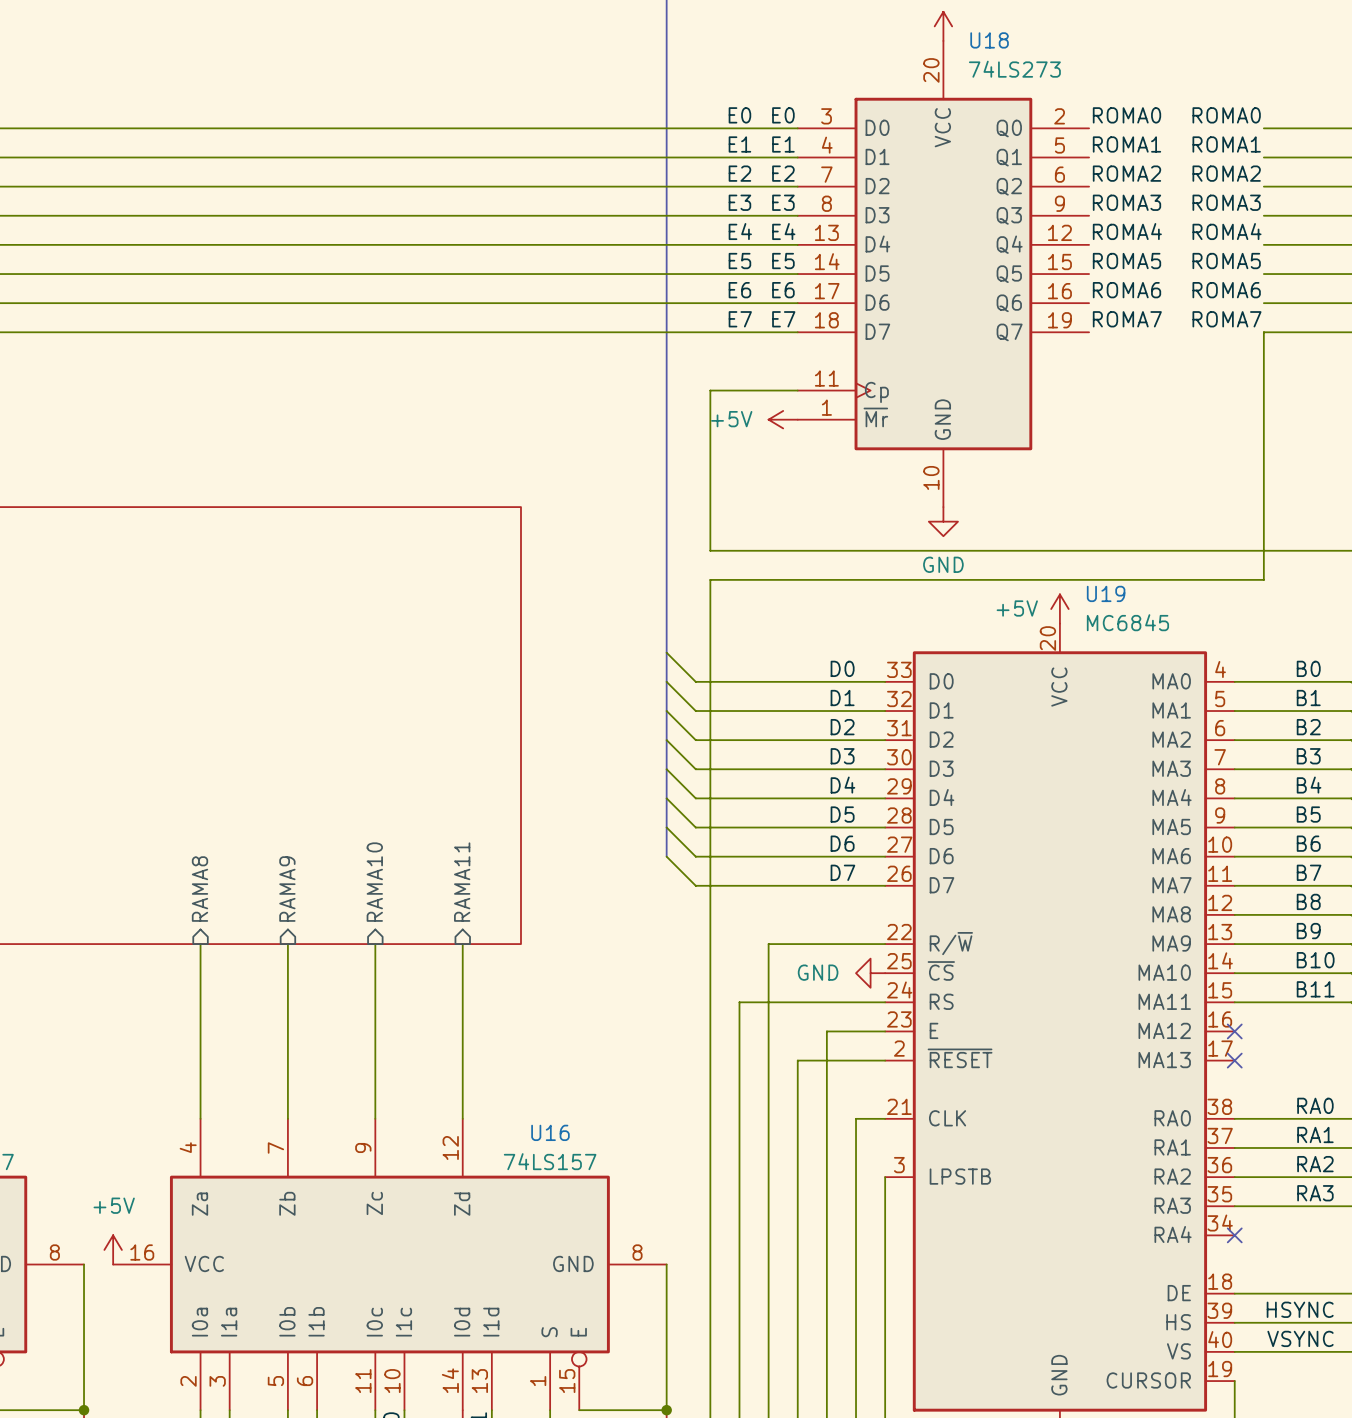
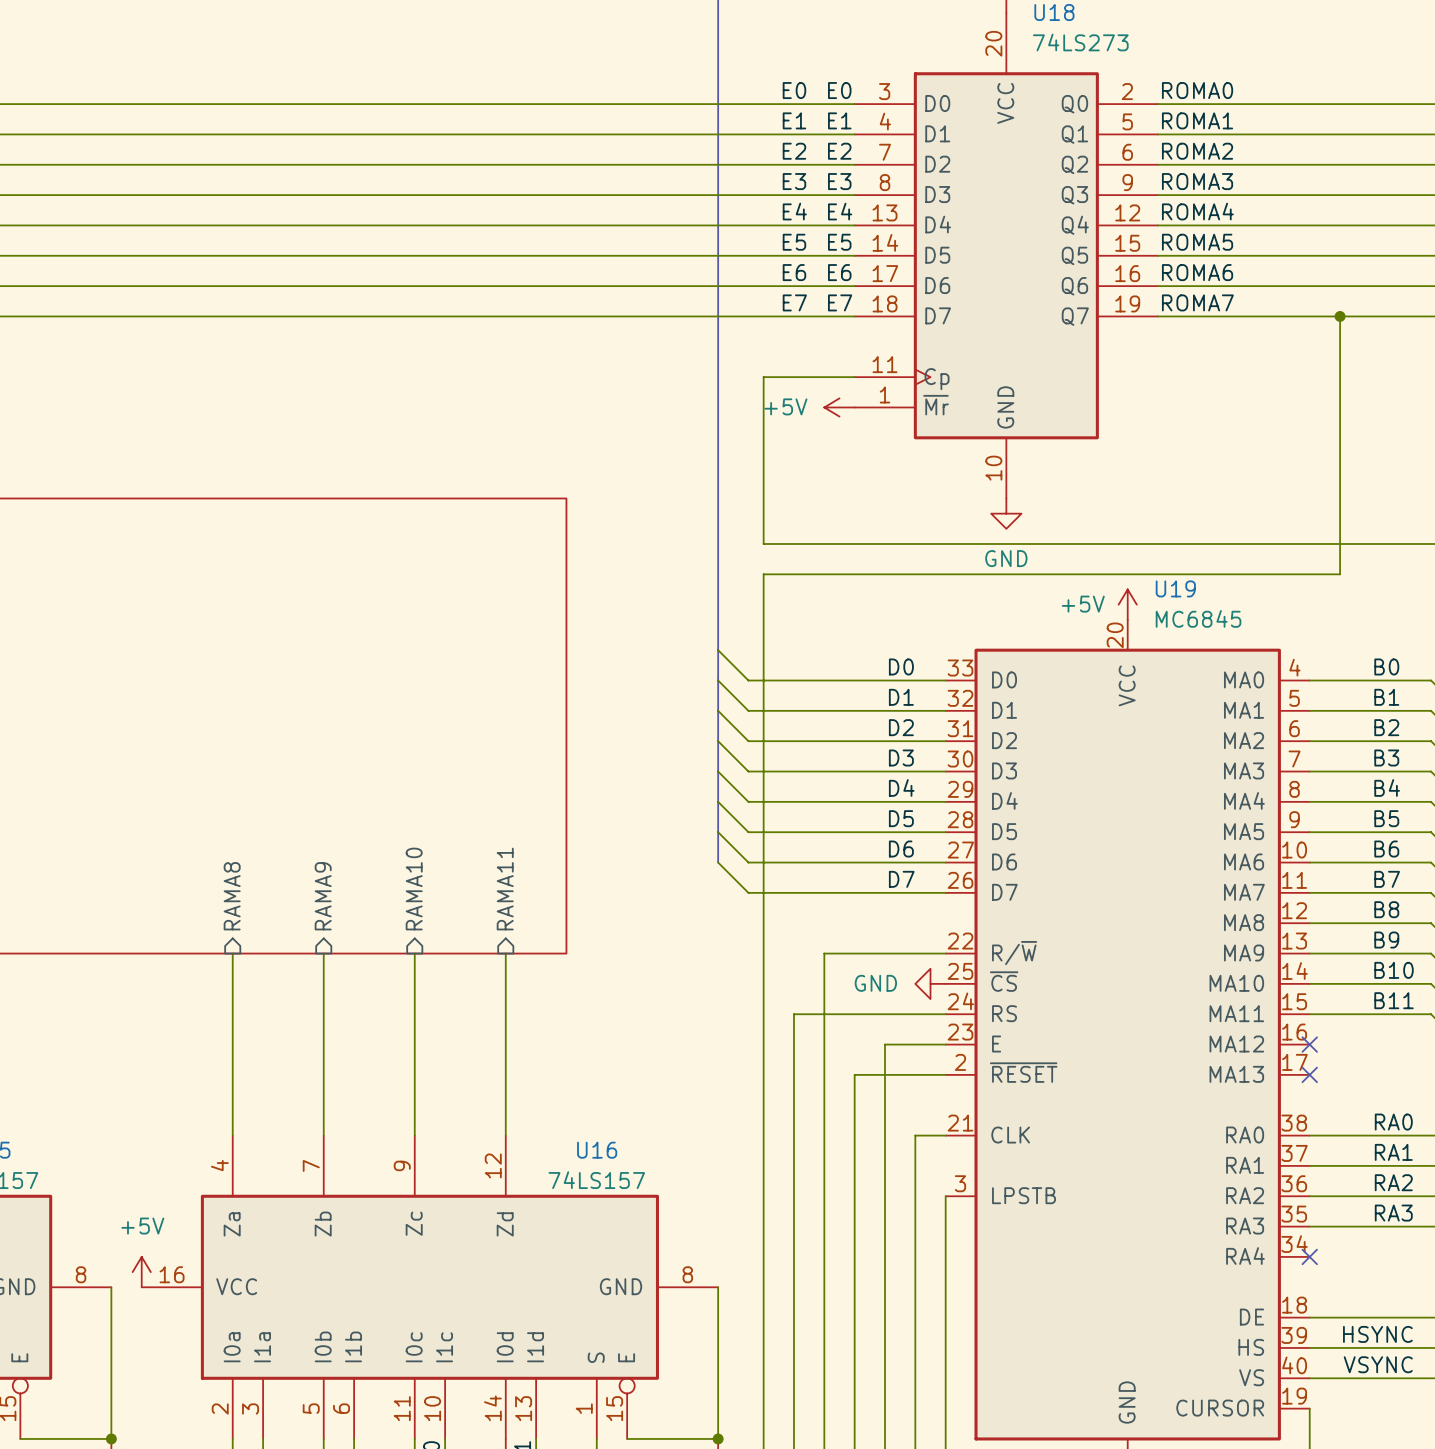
label: ROMA0 (1226, 115) -> none
wire: none -> (1158, 104) (1340, 104)
label: ROMA1 (1226, 144) -> none
wire: none -> (1158, 134) (1340, 134)
label: ROMA2 (1226, 173) -> none
wire: none -> (1158, 164) (1340, 164)
label: ROMA3 (1226, 202) -> none
wire: none -> (1158, 195) (1340, 195)
label: ROMA4 (1226, 231) -> none
wire: none -> (1158, 225) (1340, 225)
label: ROMA5 (1226, 261) -> none
wire: none -> (1158, 255) (1340, 255)
label: ROMA6 (1226, 290) -> none
wire: none -> (1158, 286) (1340, 286)
label: ROMA7 (1226, 319) -> none
wire: none -> (1158, 316) (1340, 316)
junction: none -> (1340, 316)

